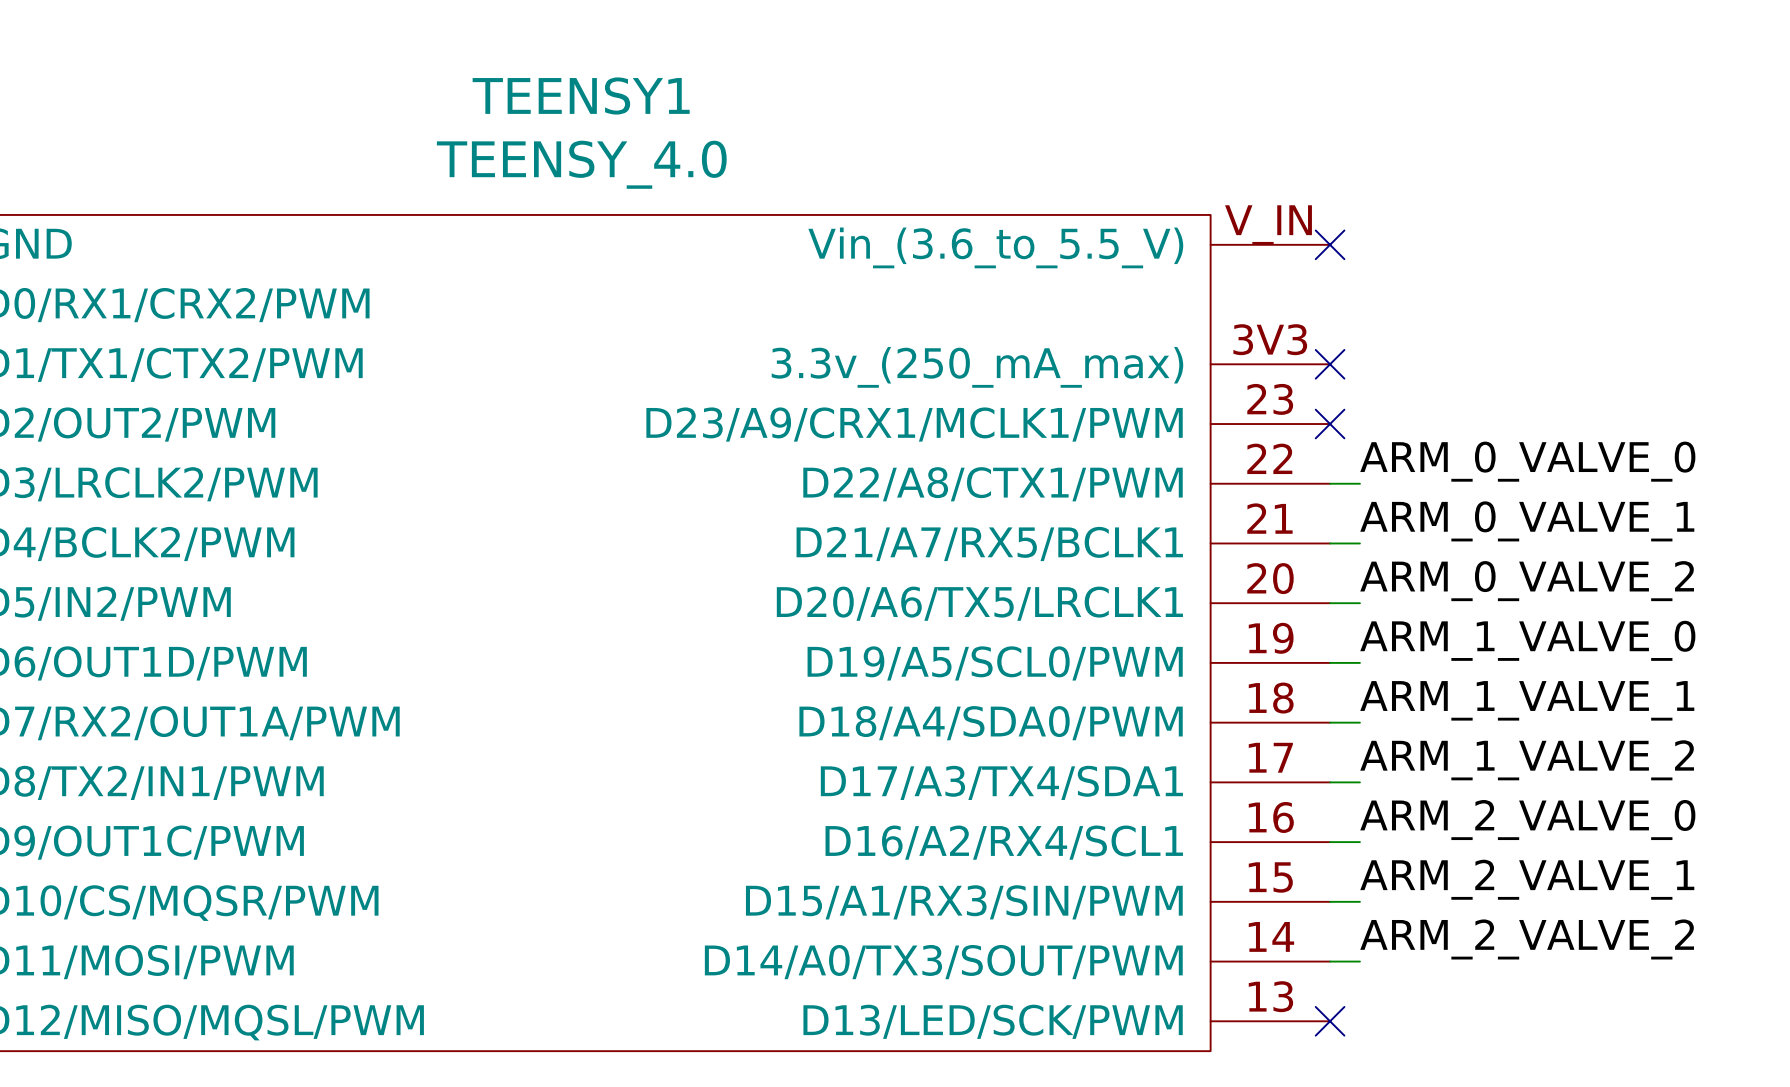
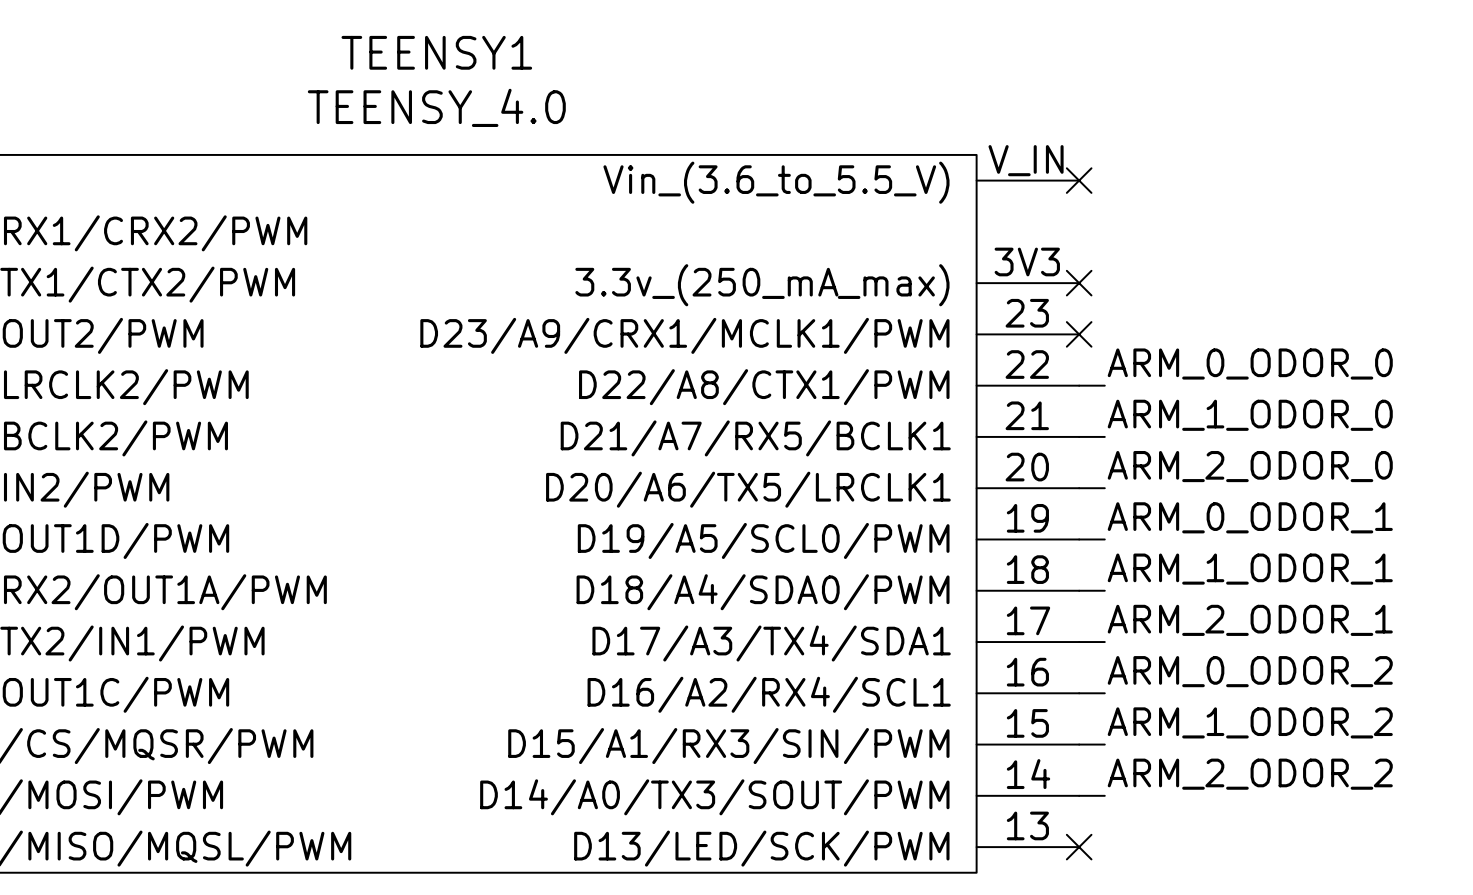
label: ARM_0_VALVE_0 (1527, 461) -> ARM_0_ODOR_0 (1250, 364)
label: ARM_0_VALVE_1 (1527, 521) -> ARM_1_ODOR_0 (1250, 415)
label: ARM_0_VALVE_2 (1527, 581) -> ARM_2_ODOR_0 (1250, 466)
label: ARM_1_VALVE_0 (1527, 640) -> ARM_0_ODOR_1 (1250, 517)
label: ARM_1_VALVE_1 (1527, 700) -> ARM_1_ODOR_1 (1250, 569)
label: ARM_1_VALVE_2 (1527, 760) -> ARM_2_ODOR_1 (1250, 620)
label: ARM_2_VALVE_0 (1527, 820) -> ARM_0_ODOR_2 (1250, 671)
label: ARM_2_VALVE_1 (1527, 879) -> ARM_1_ODOR_2 (1250, 722)
label: ARM_2_VALVE_2 (1527, 939) -> ARM_2_ODOR_2 (1250, 774)

